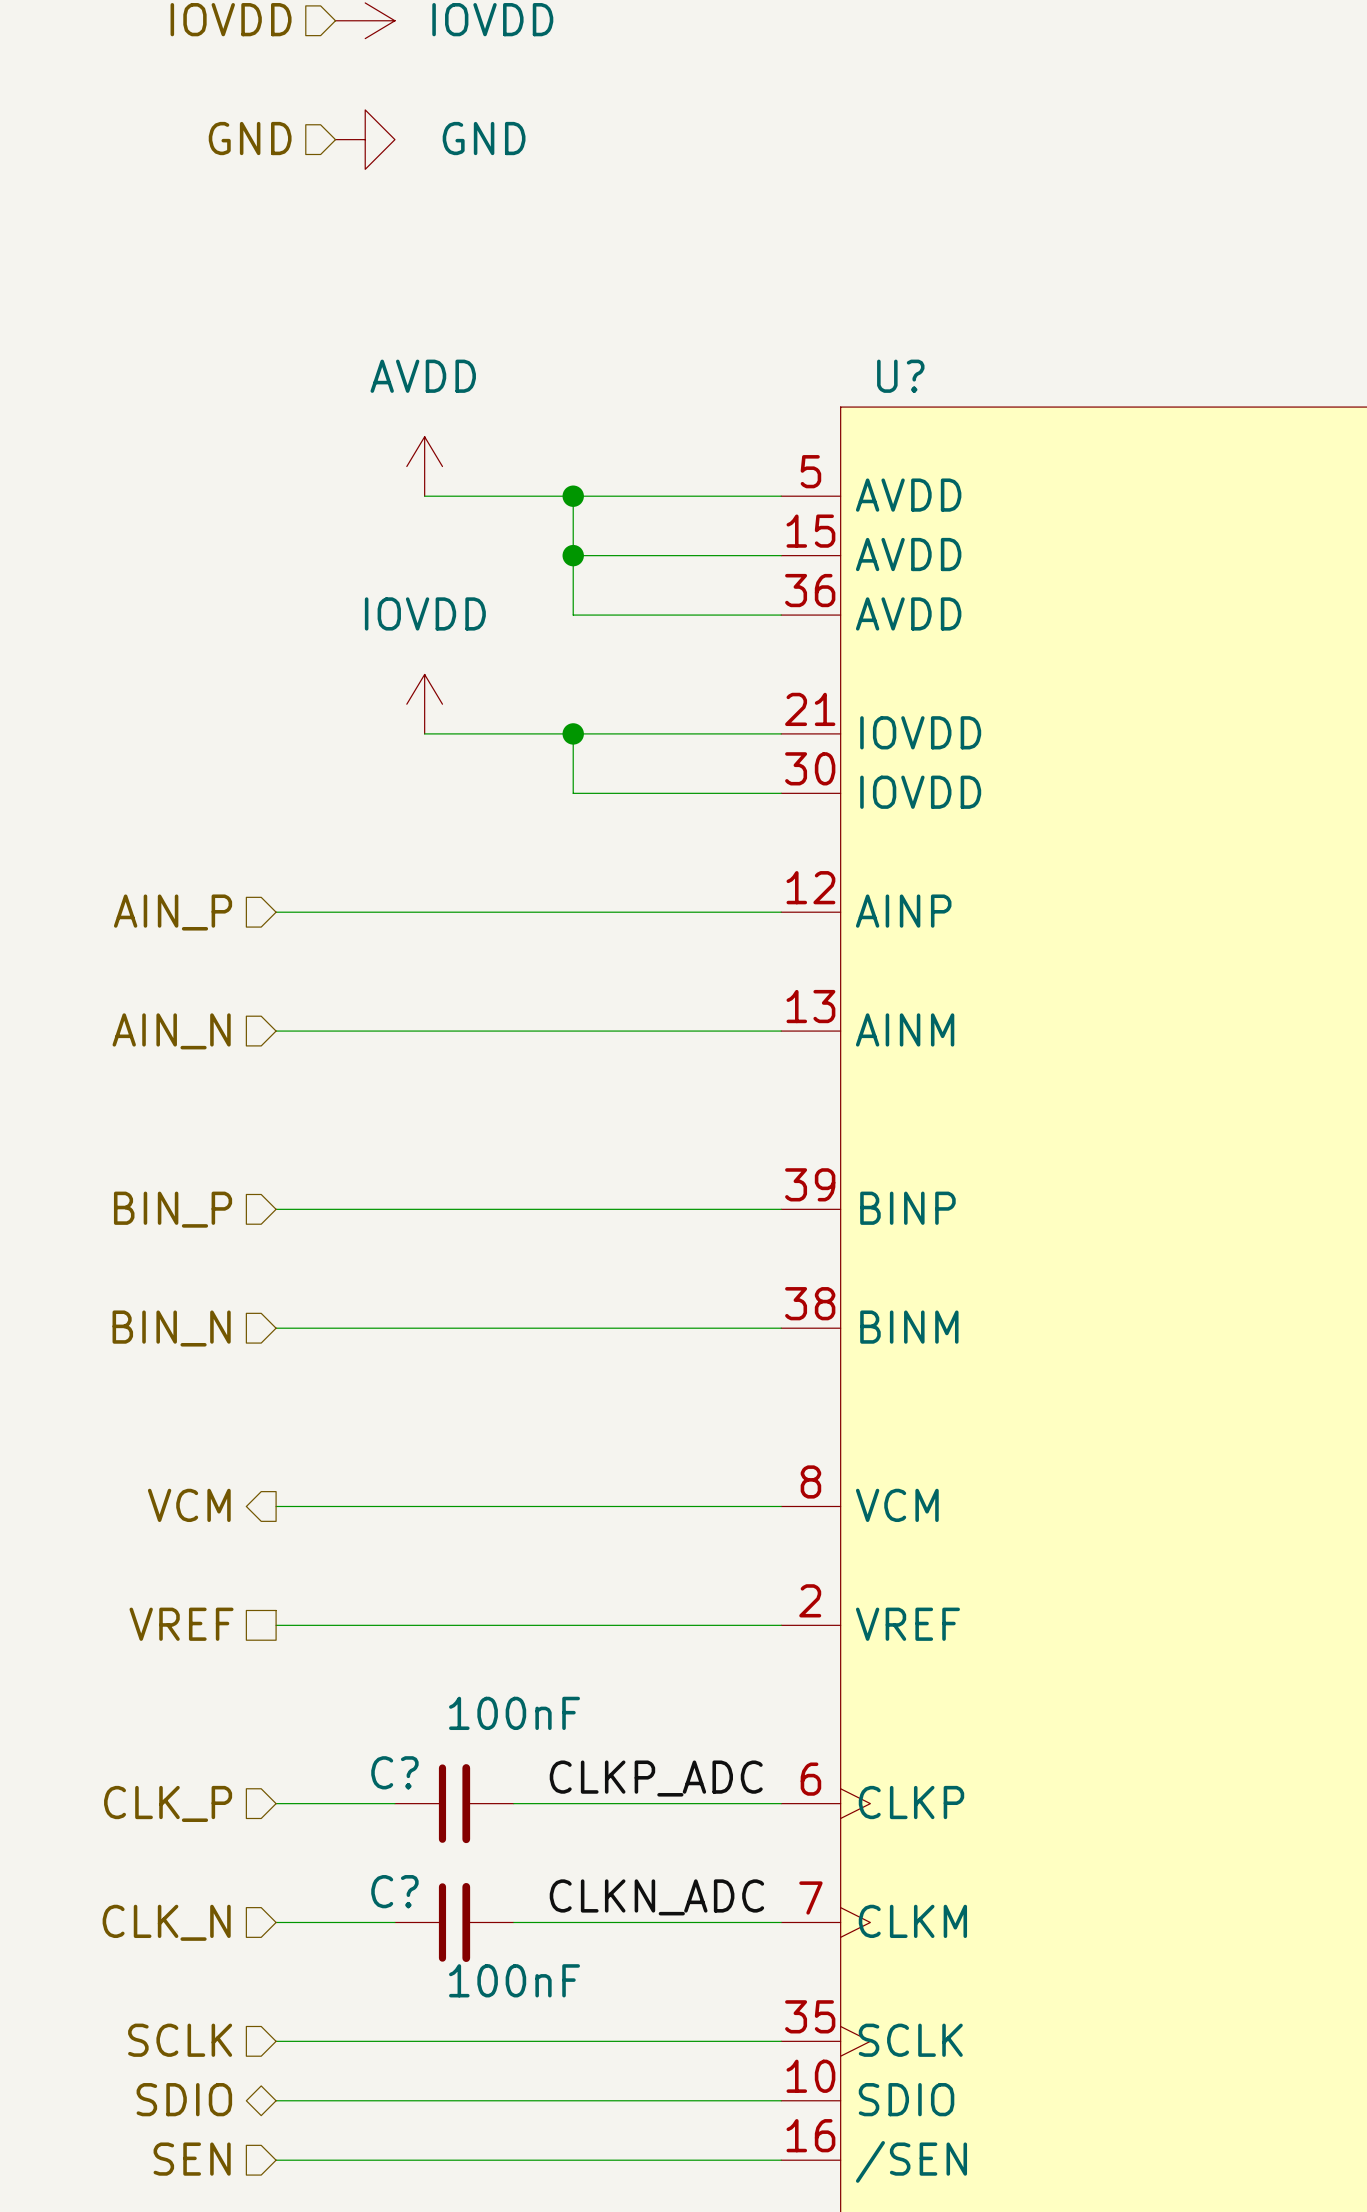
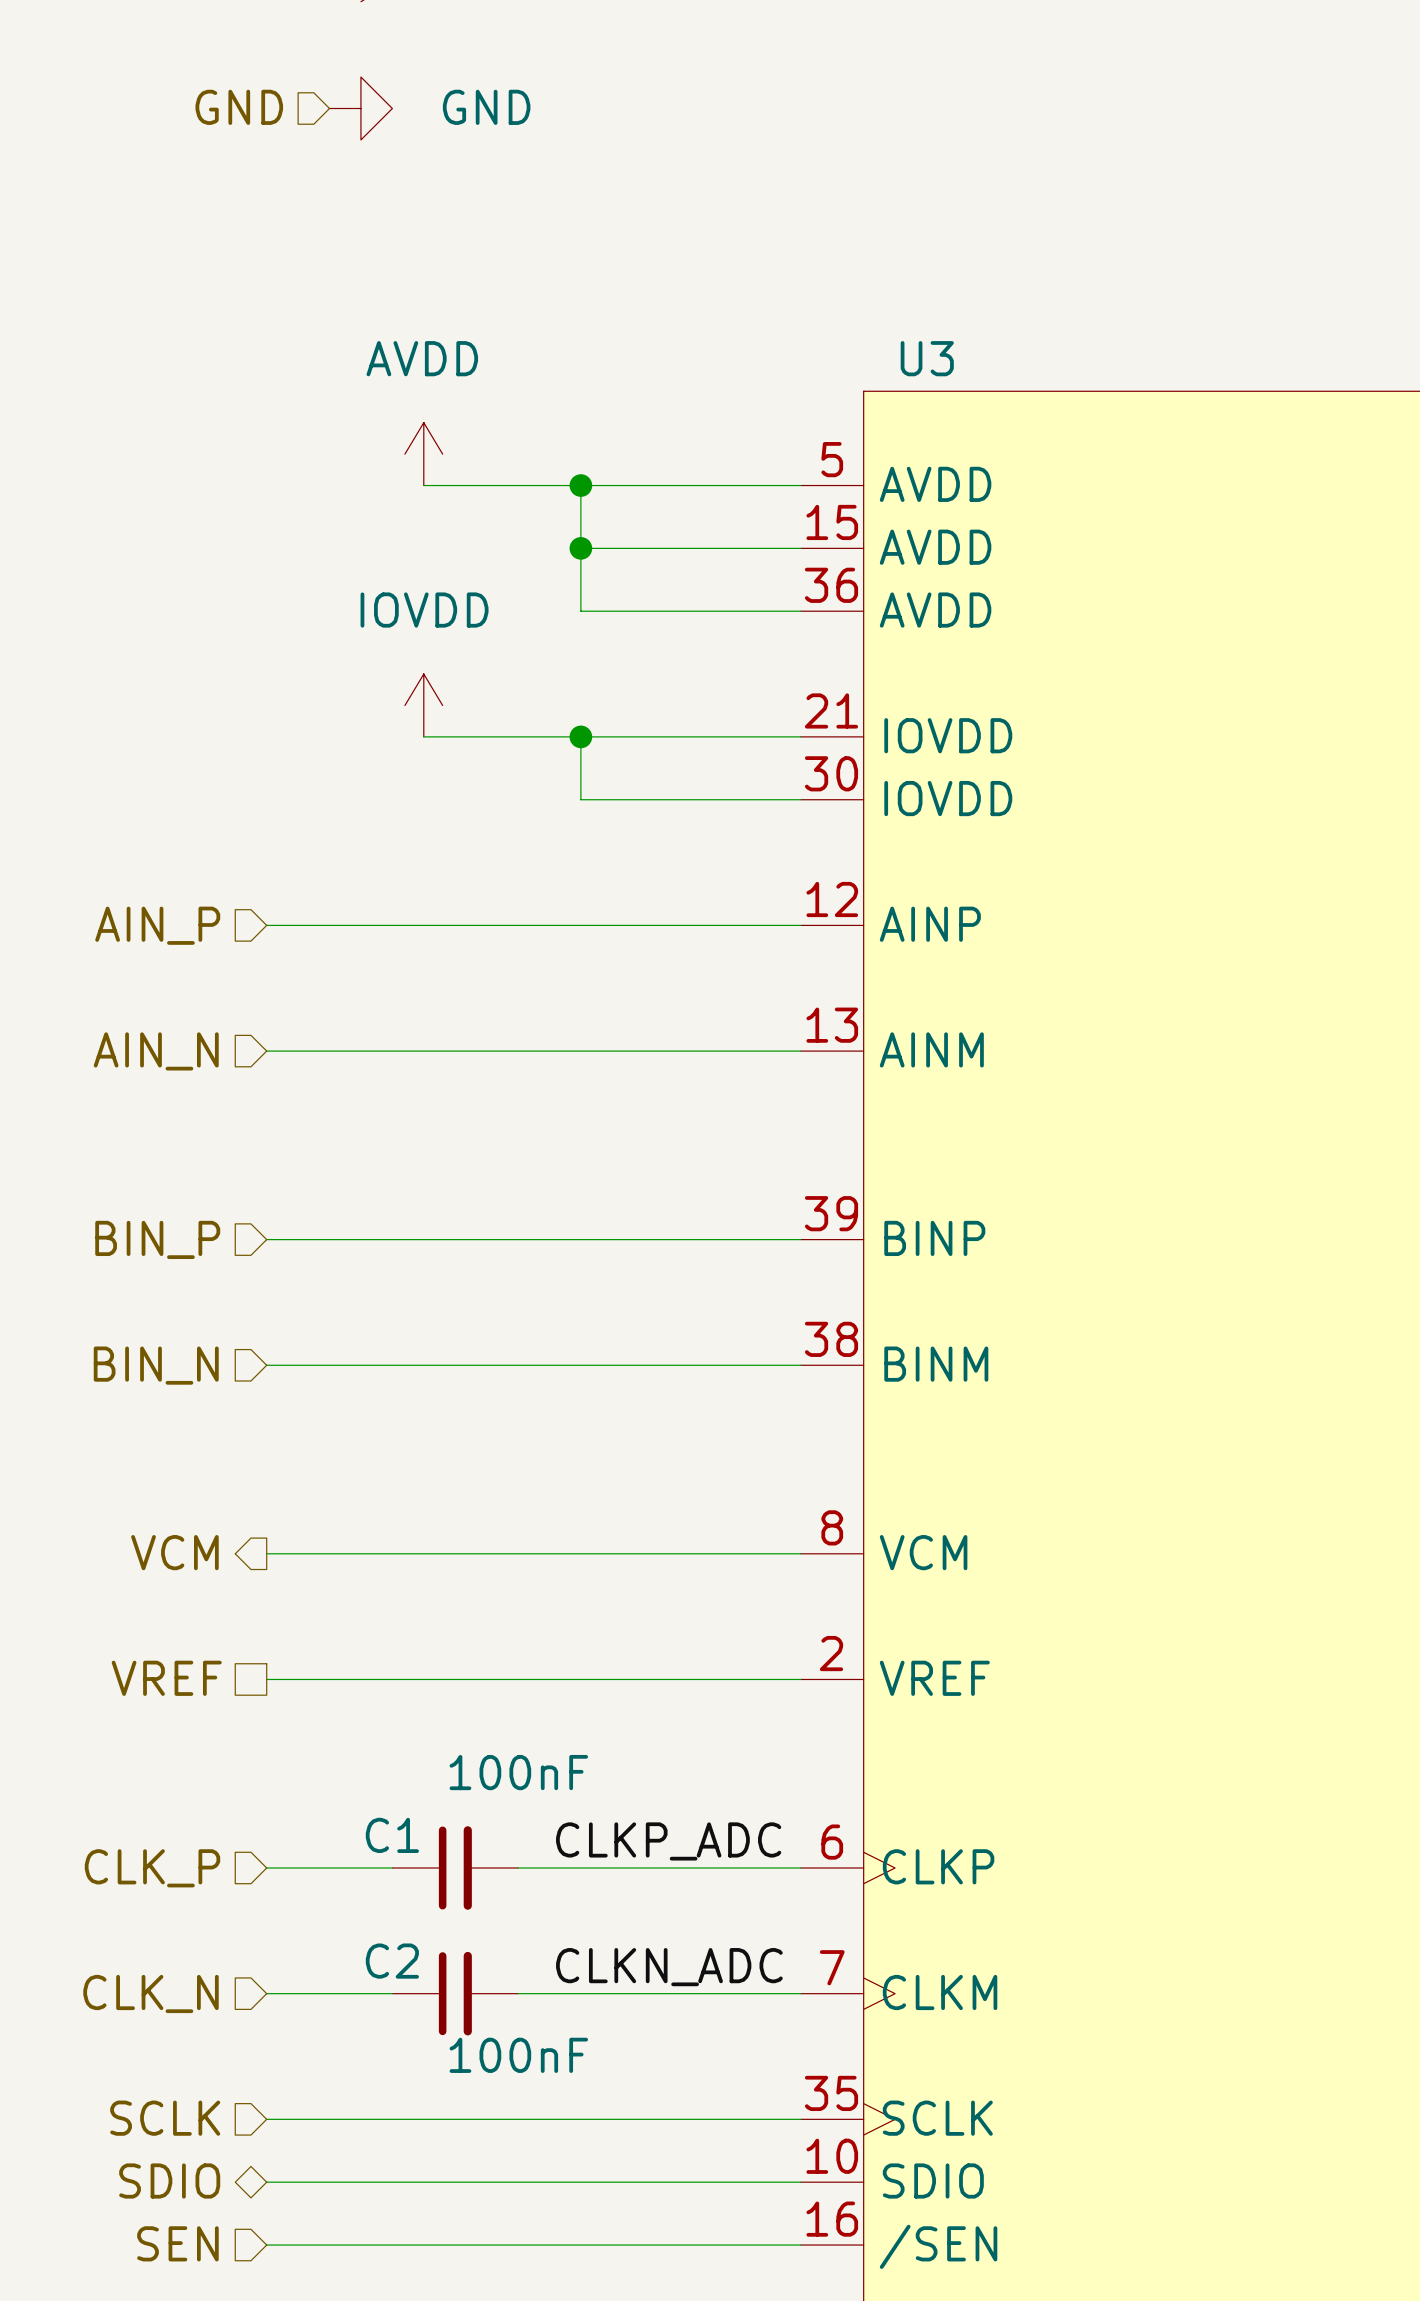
U? name: U? (900, 376) -> U3 (927, 358)
C? name: C? (394, 1772) -> C1 (392, 1835)
C? name: C? (394, 1891) -> C2 (392, 1961)

